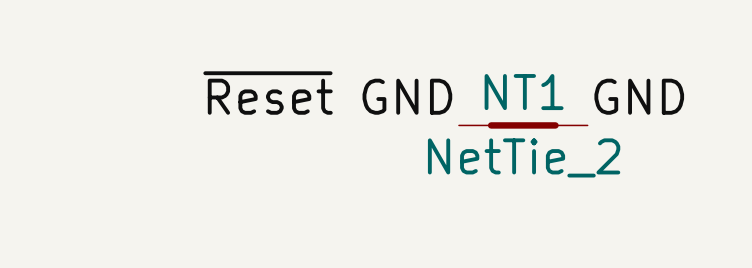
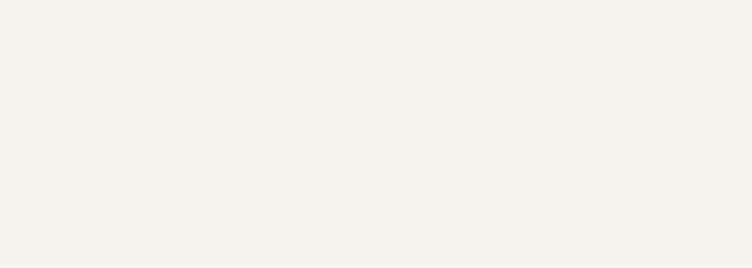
label: ~{Reset} GND (327, 93) -> none
label: GND (639, 96) -> none
NT1: NetTie_2 (523, 125) -> none

